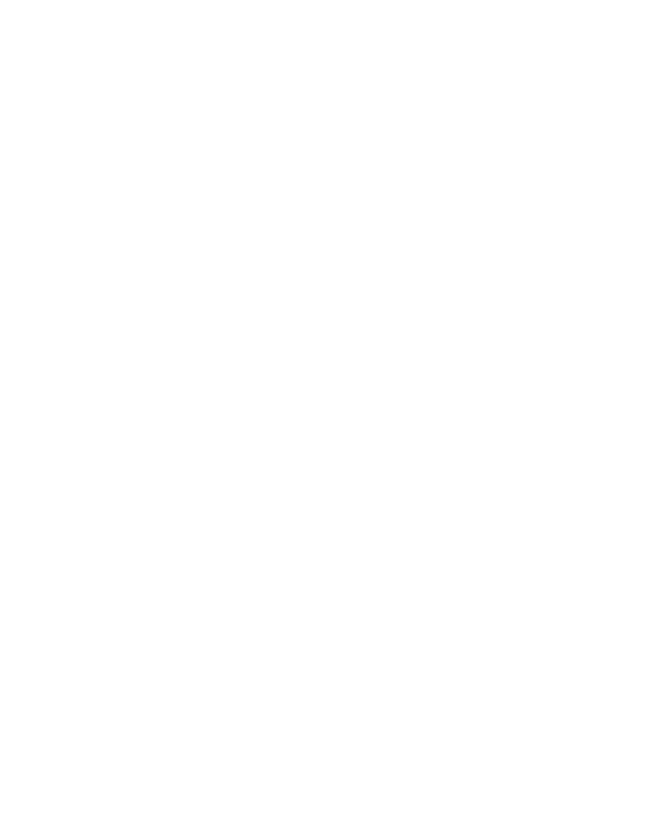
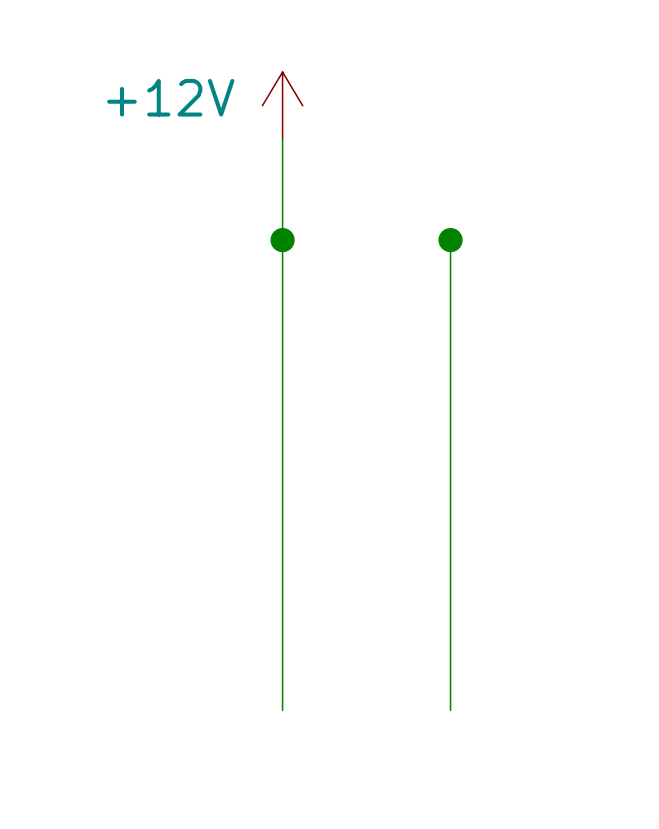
power symbol: none -> +12V (282, 105)
wire: none -> (282, 139) (282, 710)
junction: none -> (282, 240)
wire: none -> (450, 240) (450, 710)
junction: none -> (450, 240)

